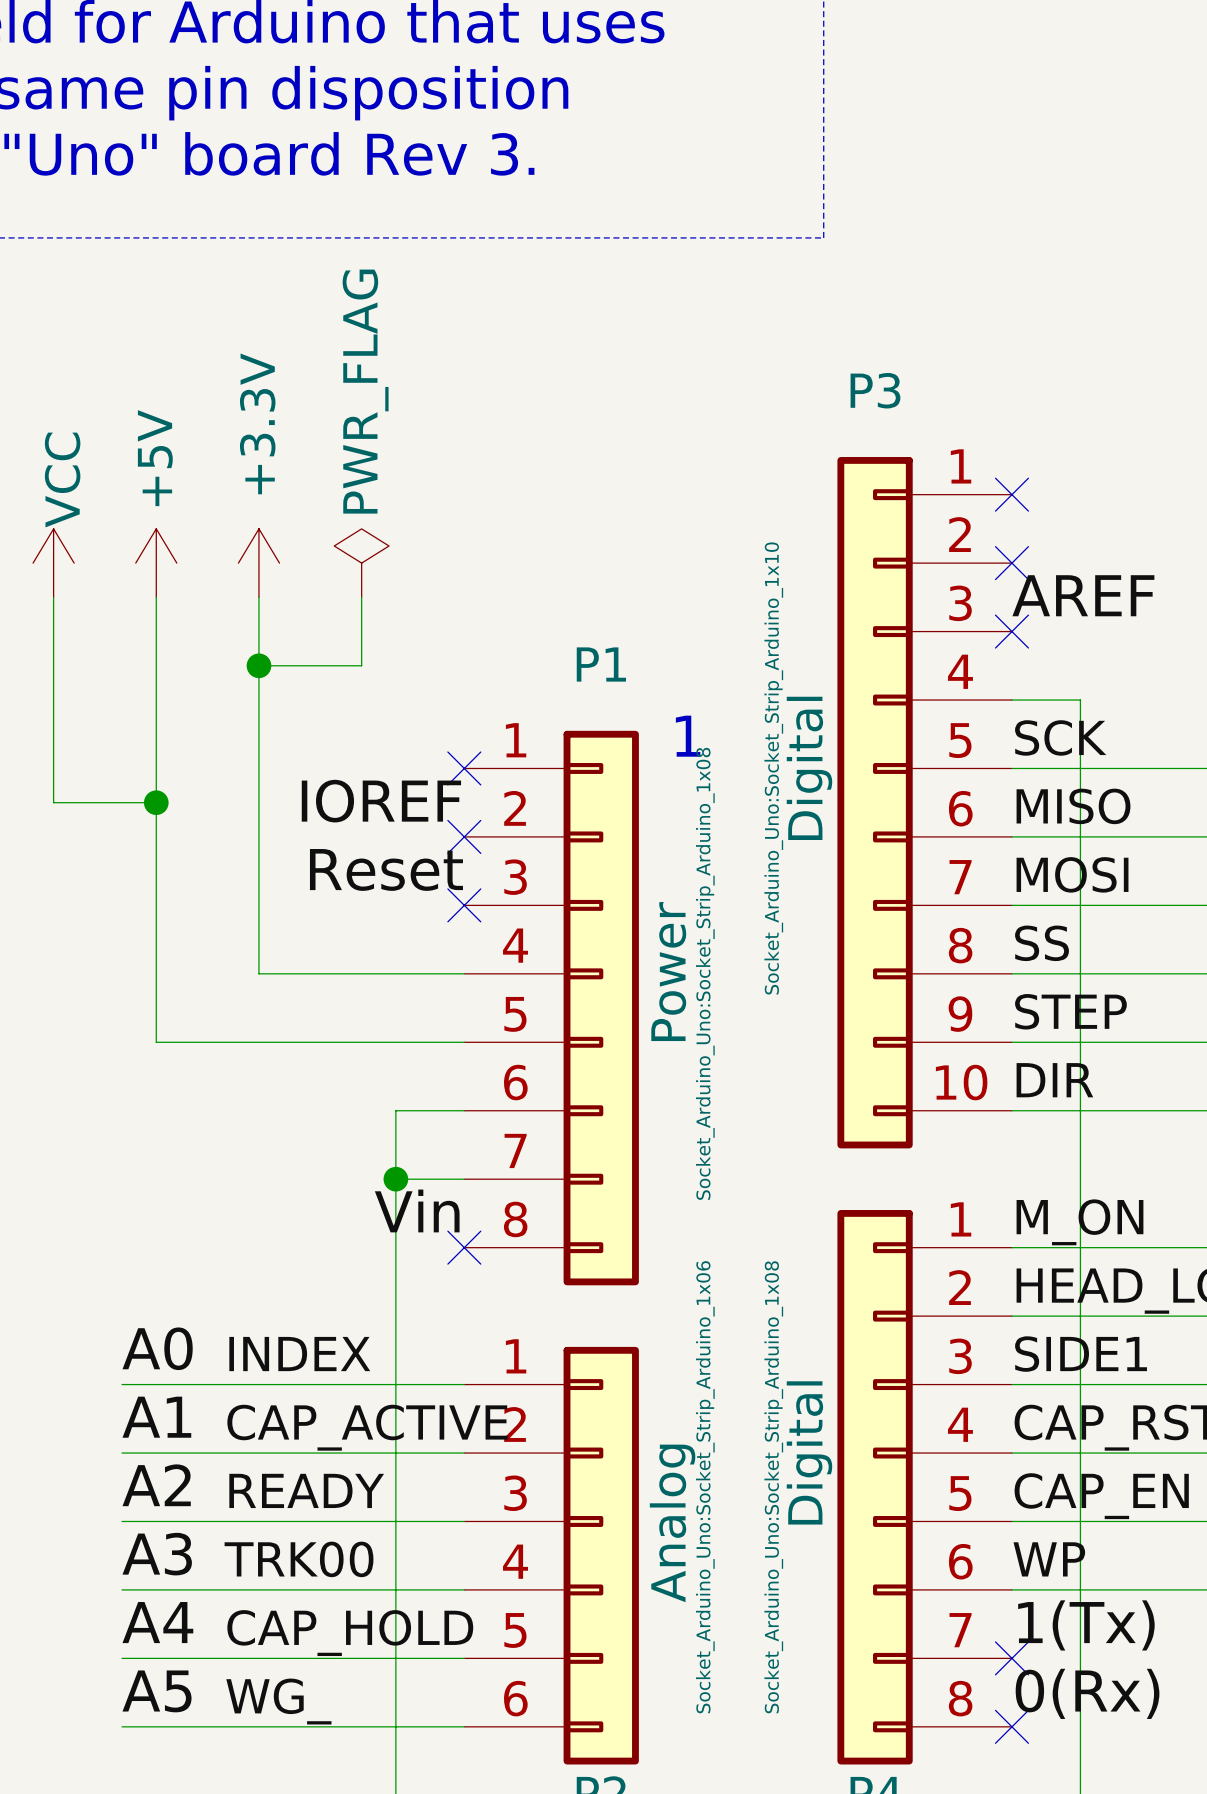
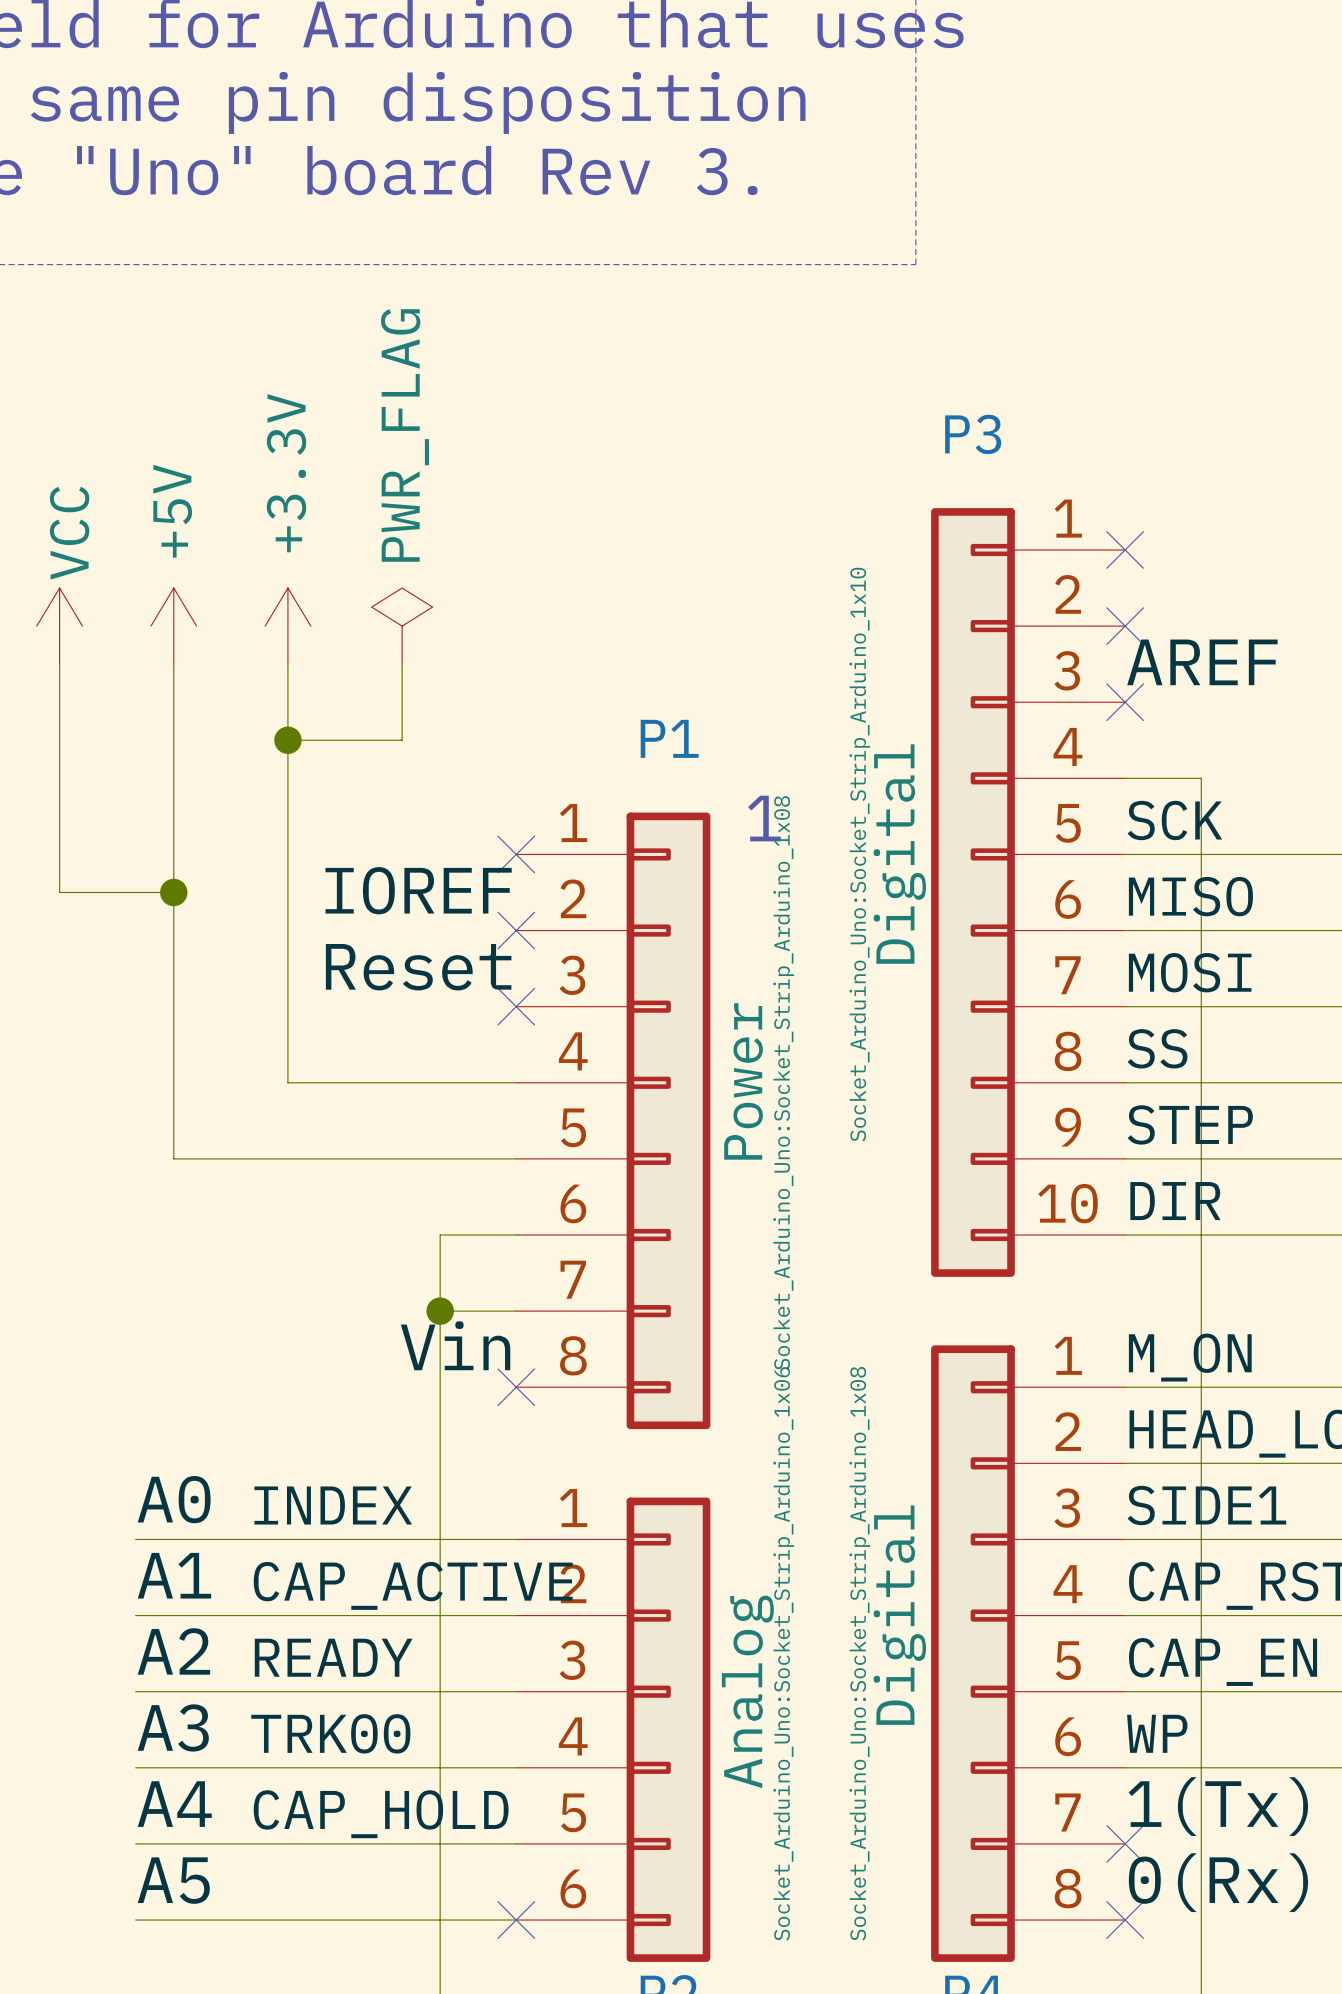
label: WG_ (278, 1701) -> none
no-connect mark: none -> (516, 1920)

